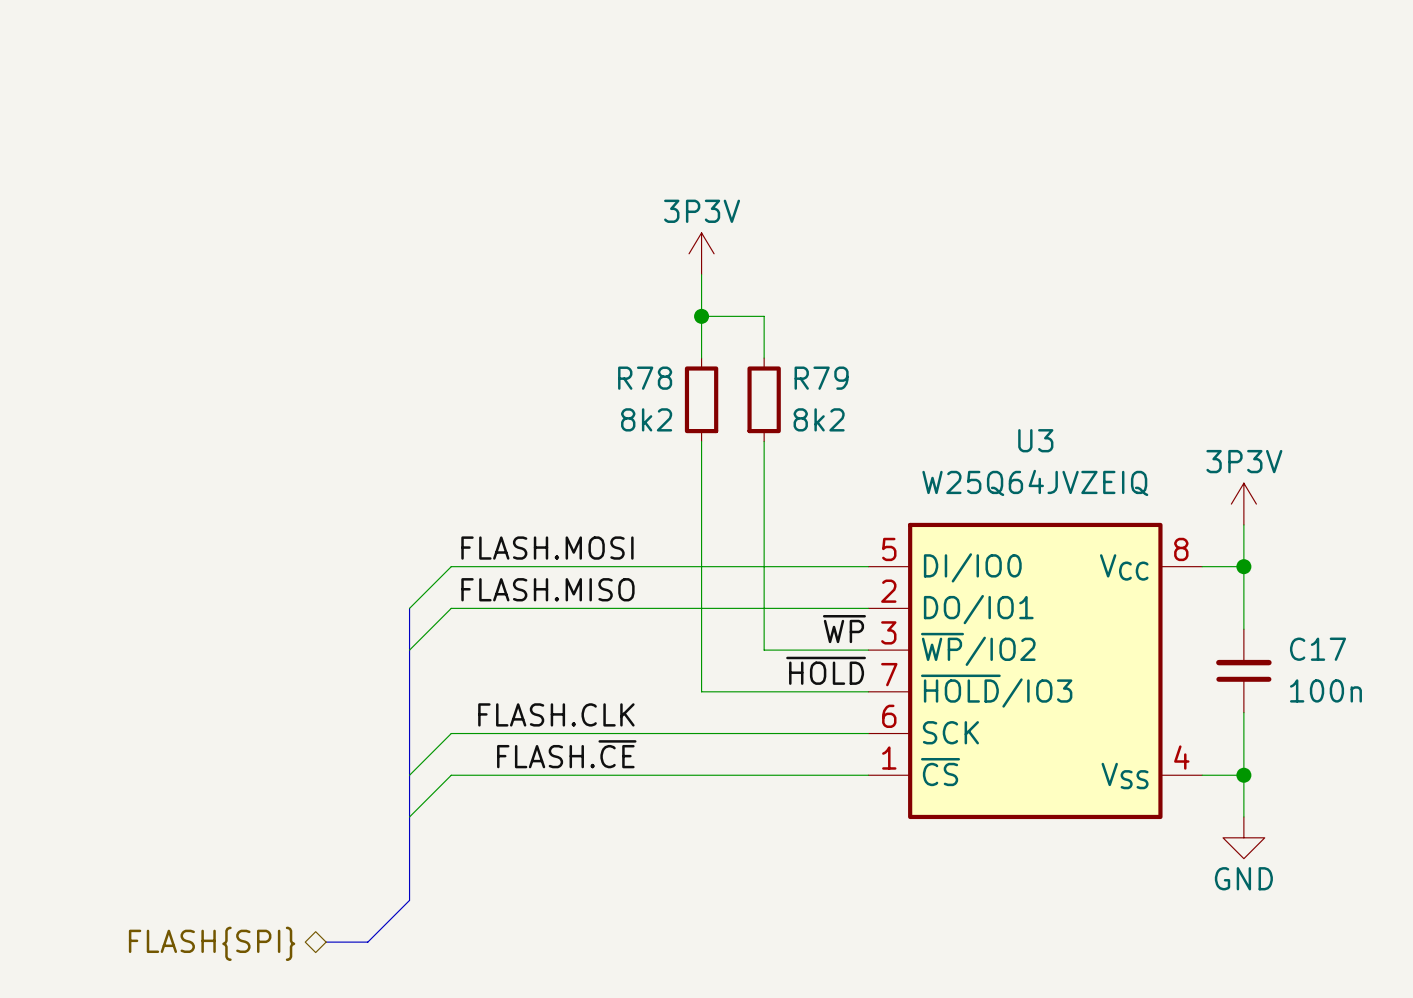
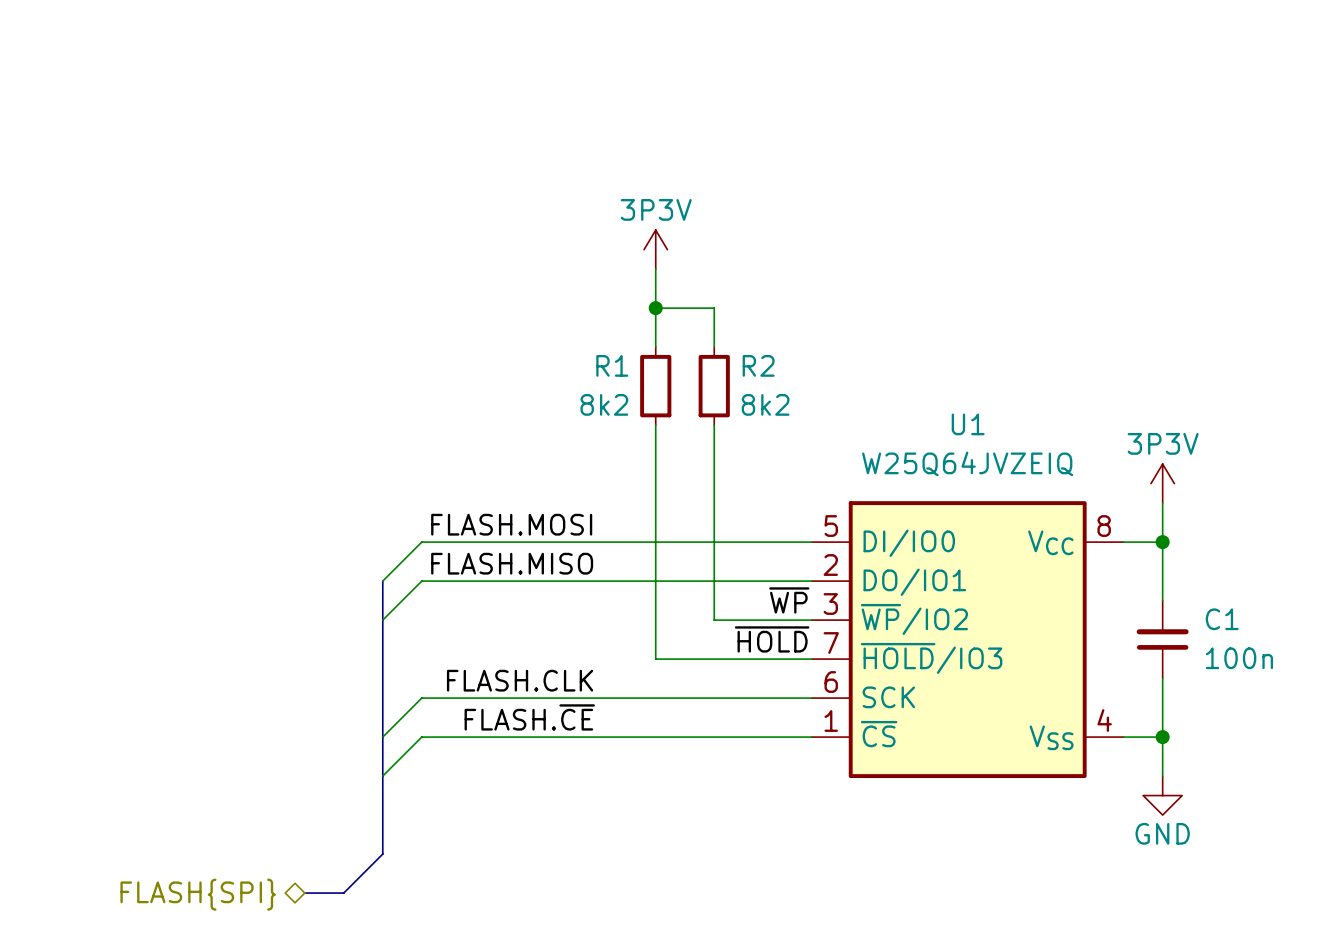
R78 name: R78 (645, 378) -> R1 (612, 365)
R79 name: R79 (821, 378) -> R2 (758, 365)
U3 name: U3 (1035, 440) -> U1 (968, 424)
C17 name: C17 (1318, 649) -> C1 (1222, 619)

